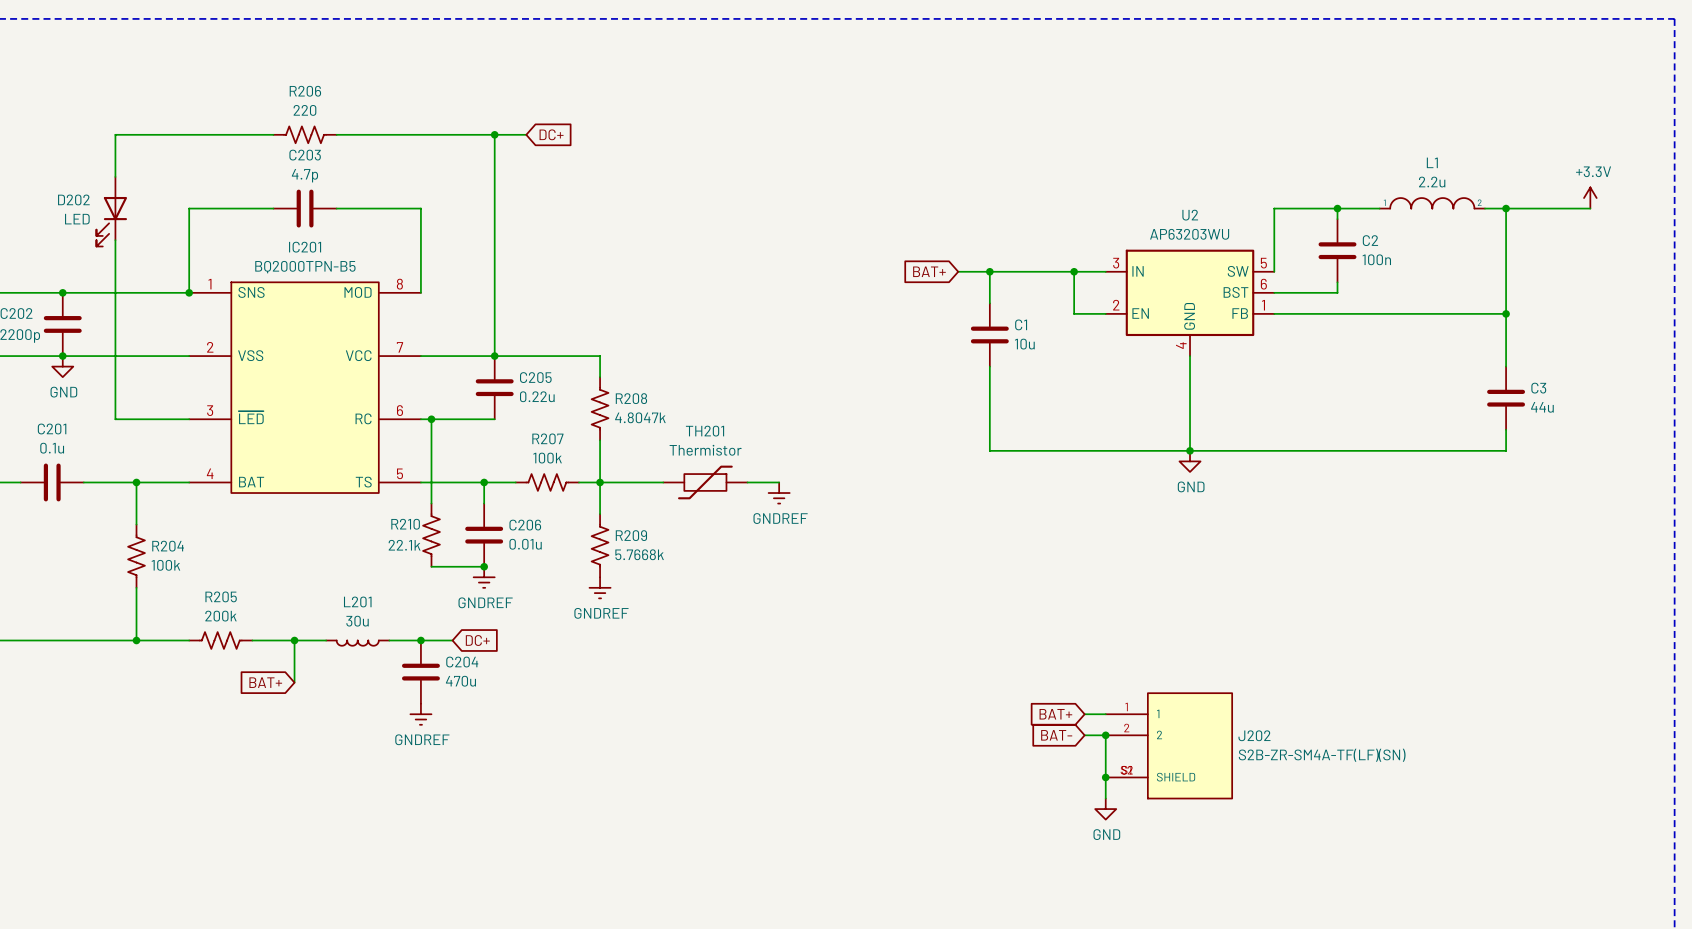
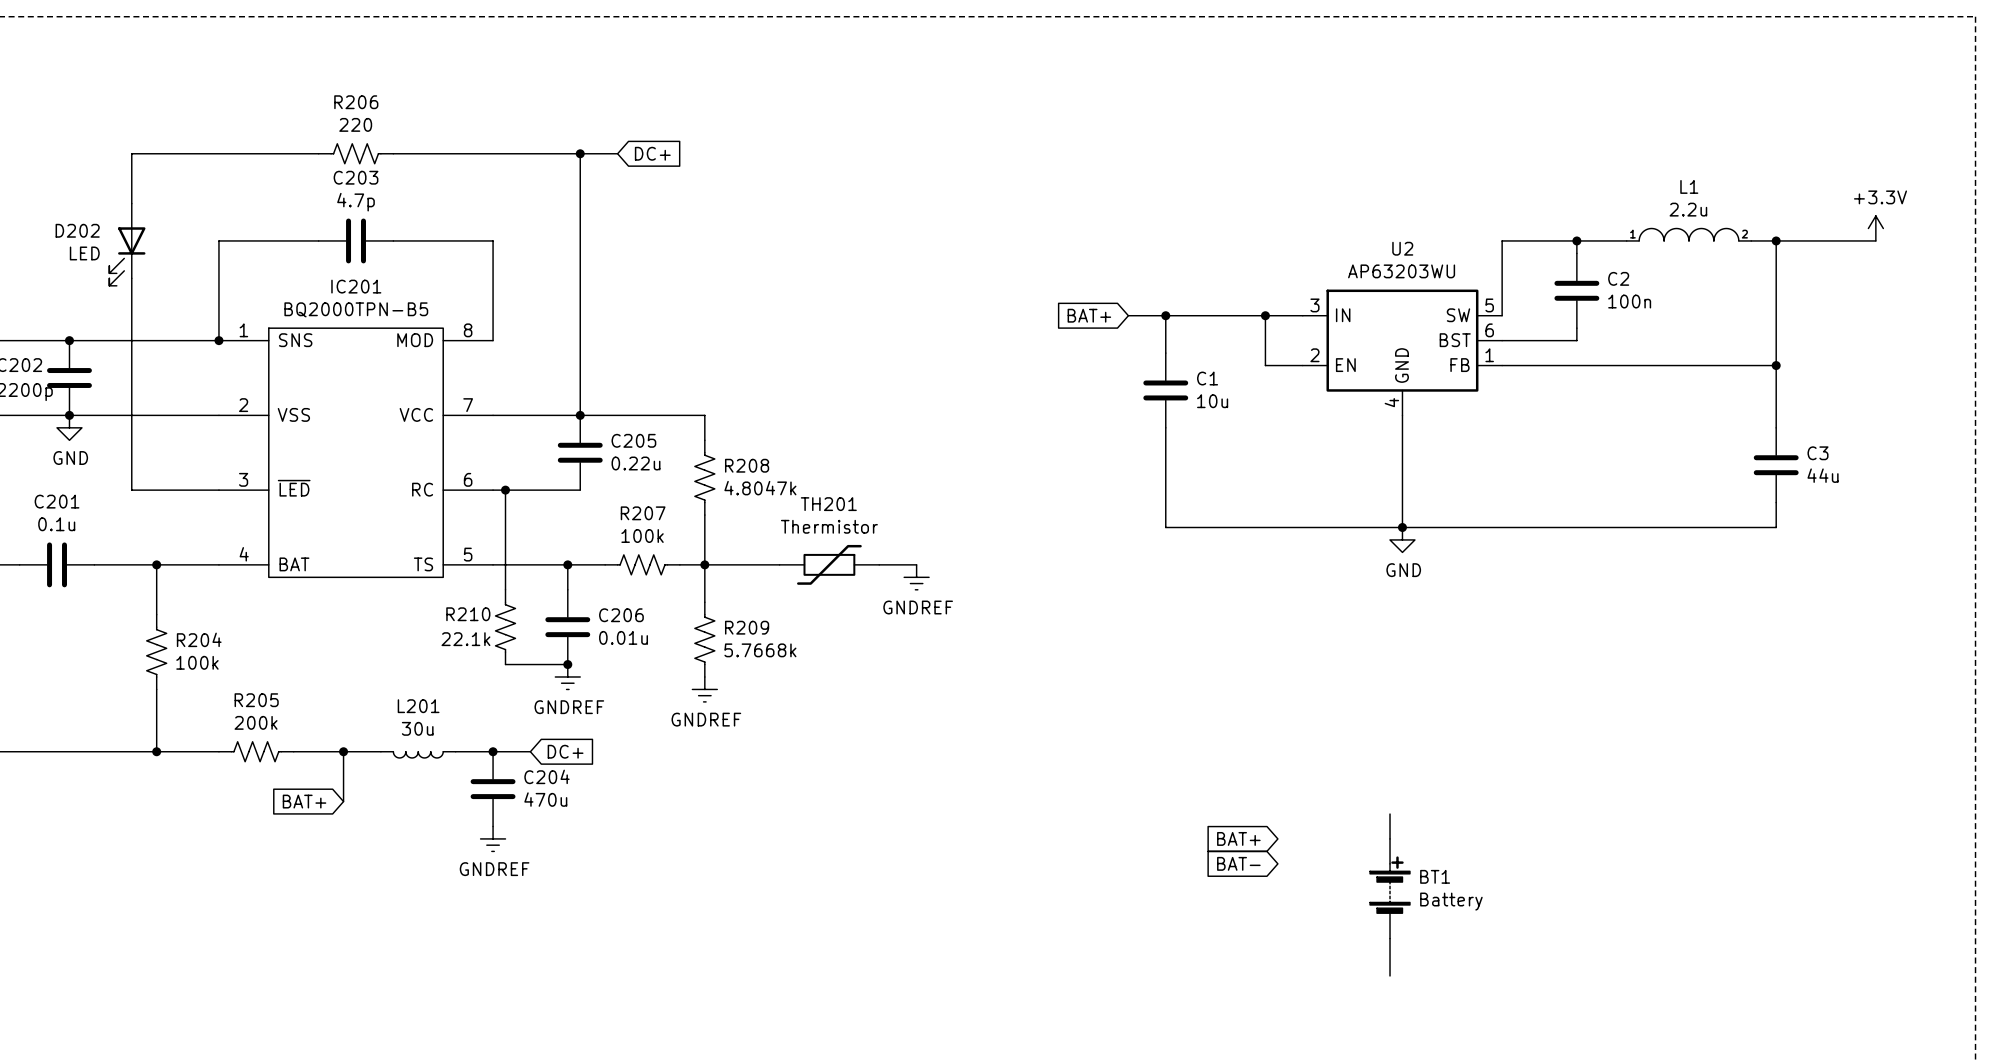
wire: (1084, 714) (1105, 714) -> none
wire: (1084, 735) (1105, 735) (1105, 798) -> none
junction: (1105, 735) -> none
J202: S2B-ZR-SM4A-TF(LF)(SN) (1169, 745) -> none
BT1: none -> Battery (1390, 888)
junction: (1105, 777) -> none
wire: none -> (1390, 938) (1390, 975)
power symbol: GND (1105, 809) -> none

